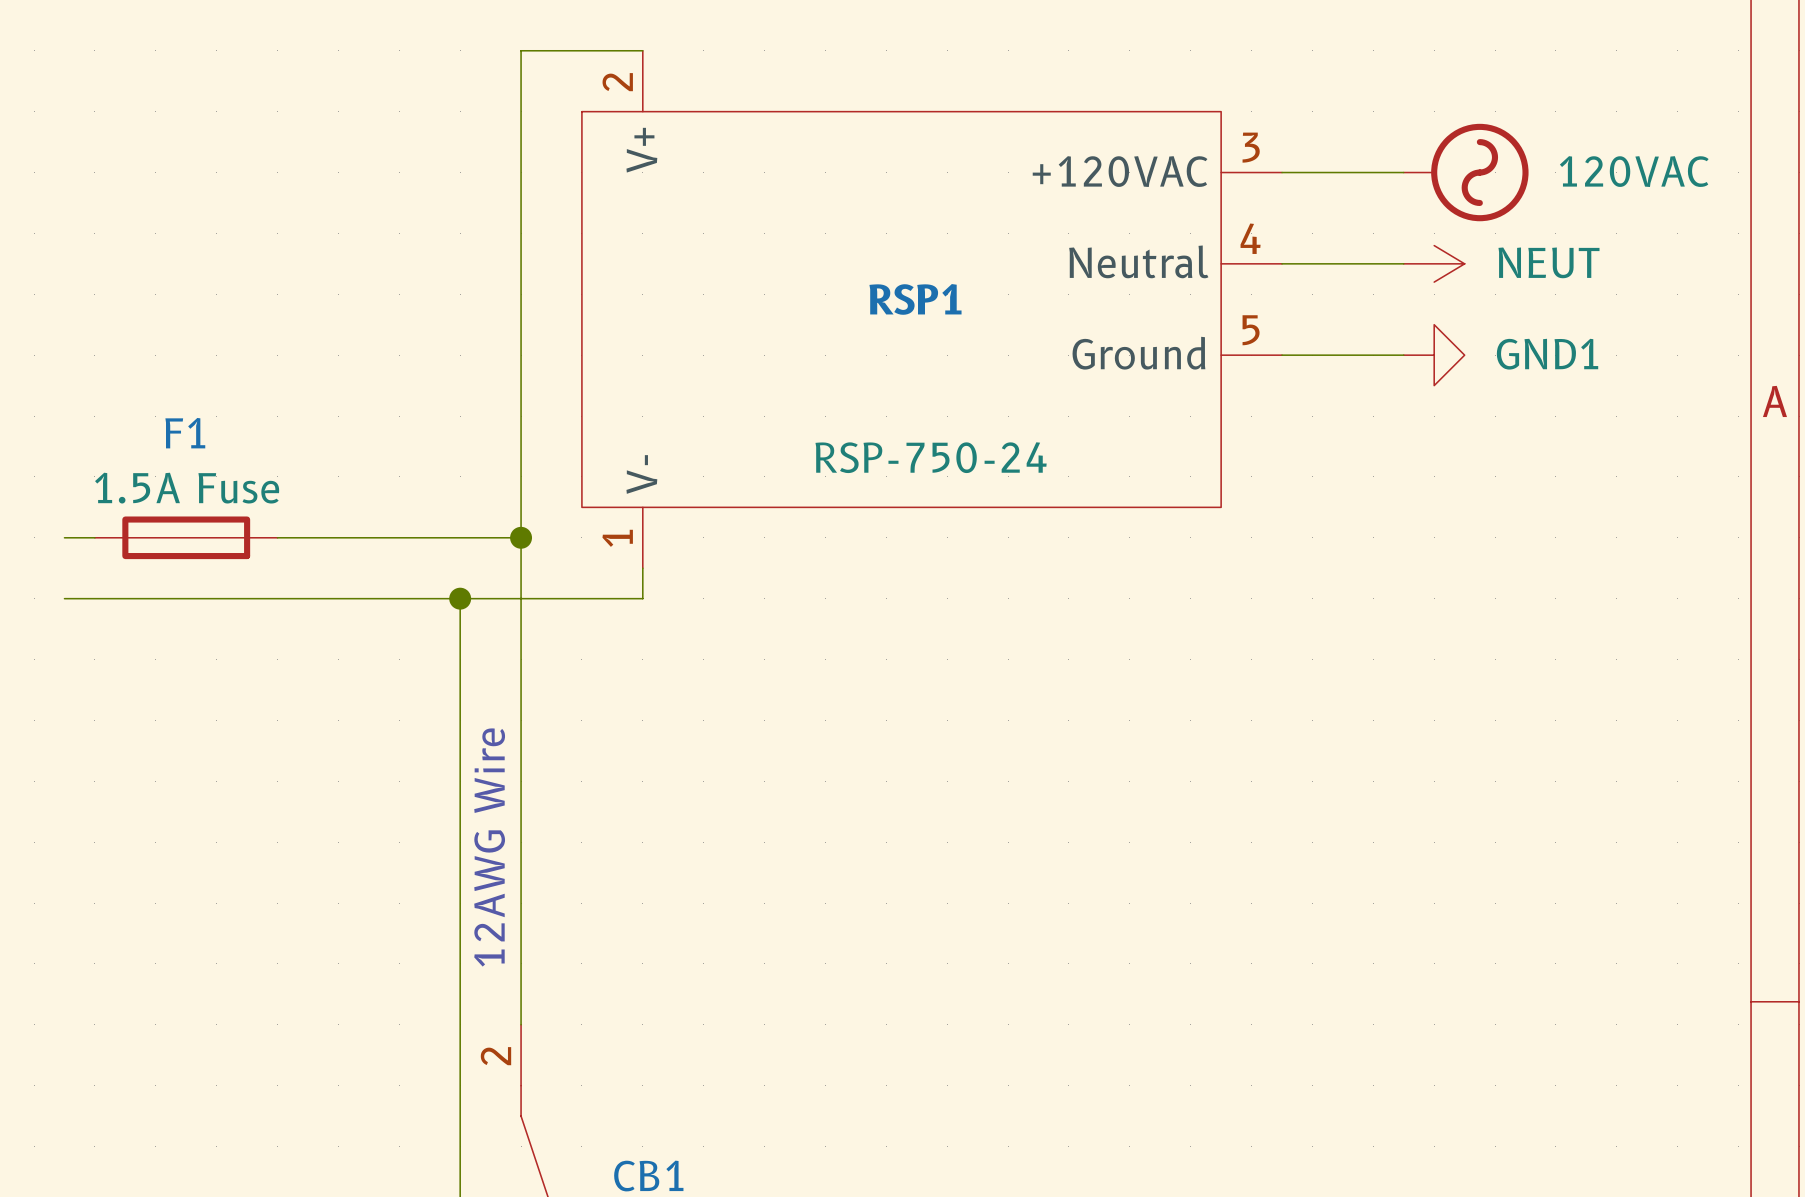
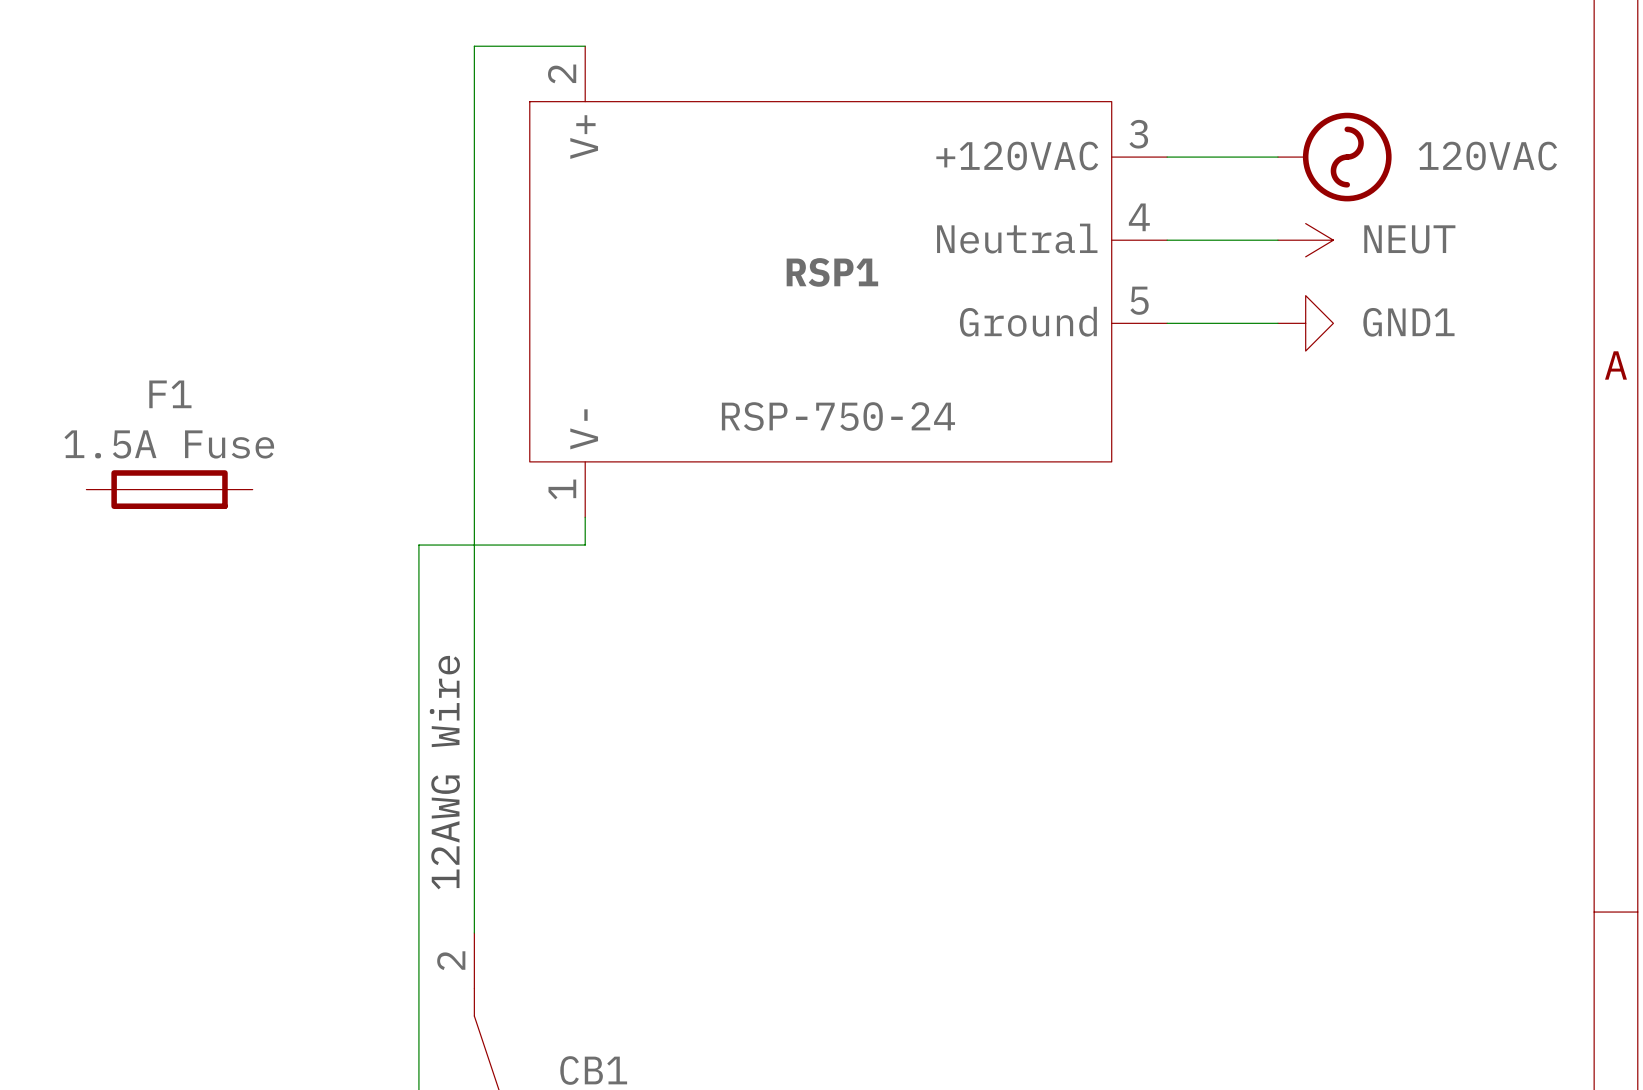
wire: (64, 537) (94, 537) -> none
wire: (277, 537) (521, 537) -> none
junction: (521, 537) -> none
wire: (64, 598) (460, 598) -> none
junction: (460, 598) -> none

